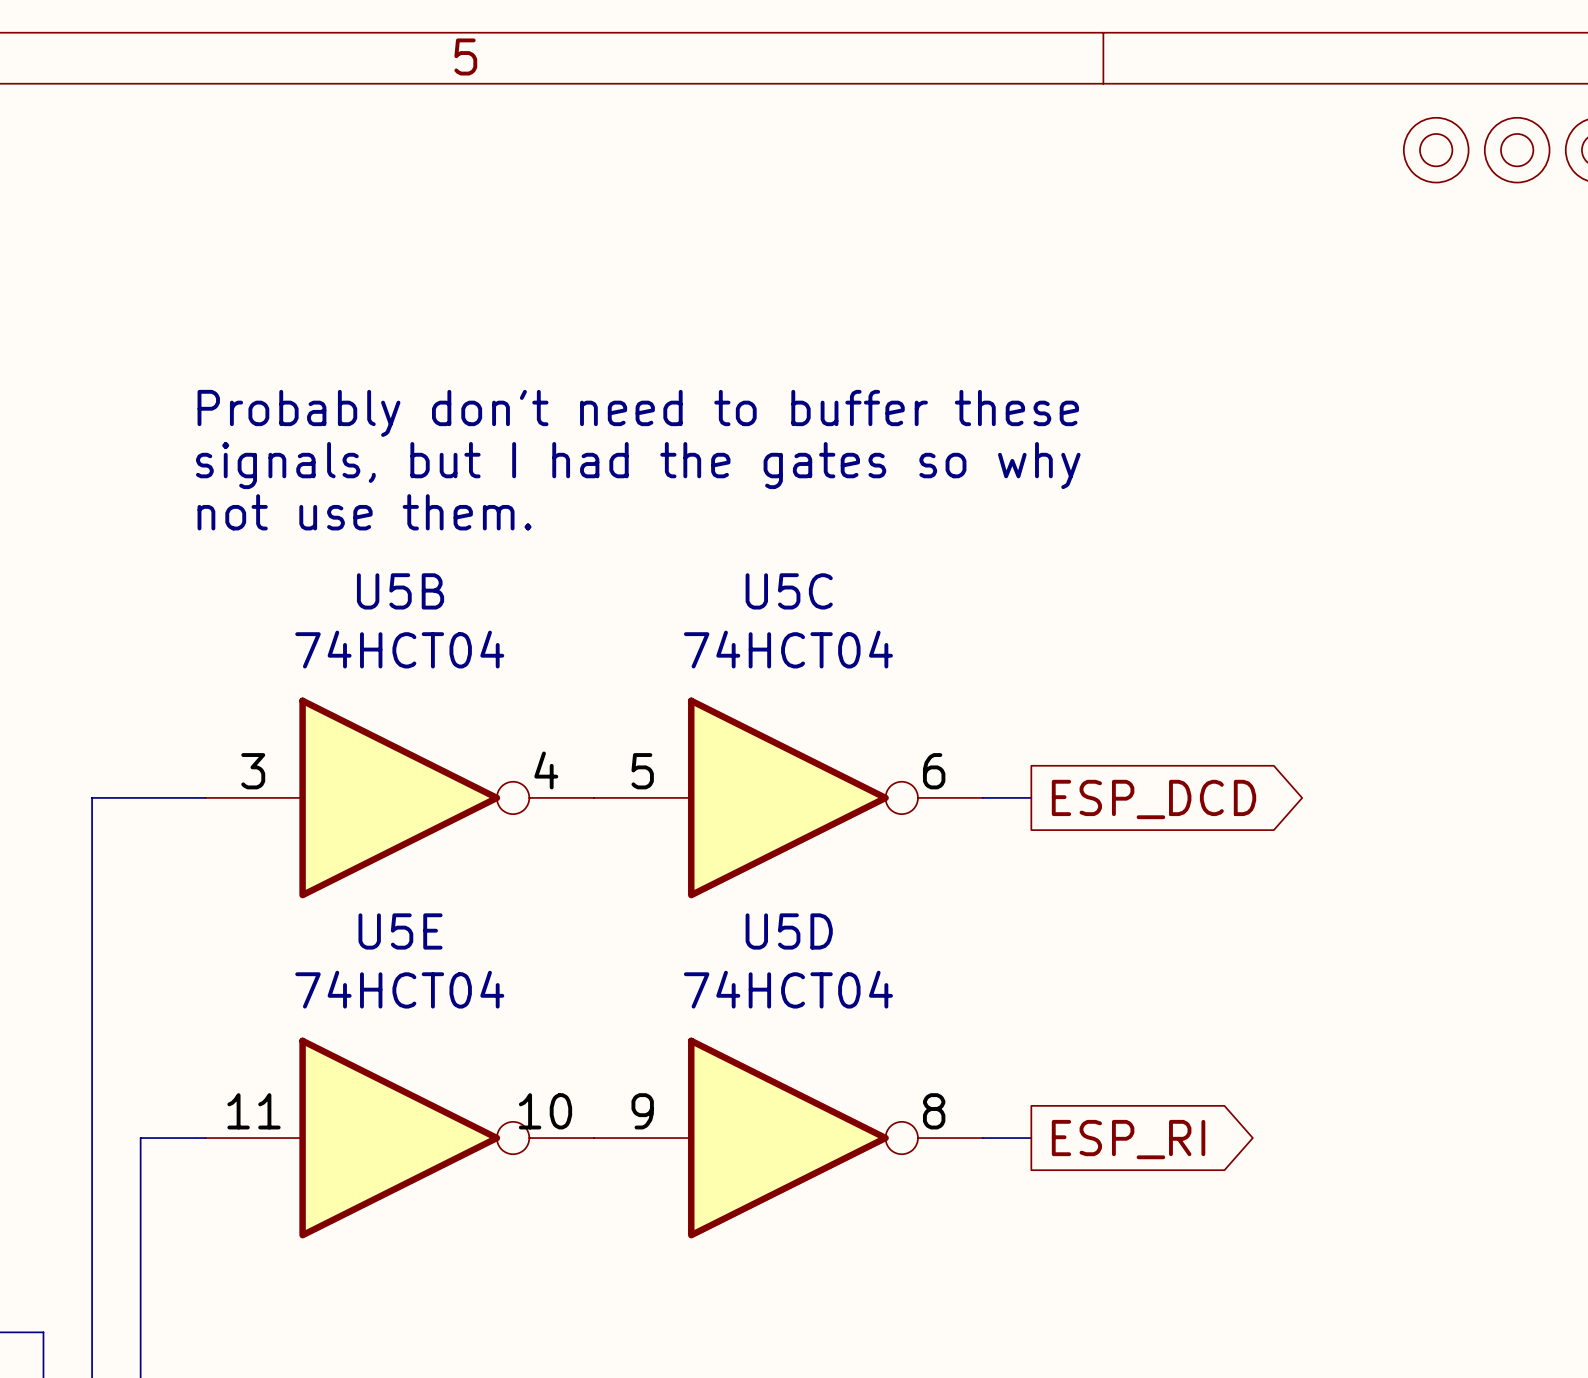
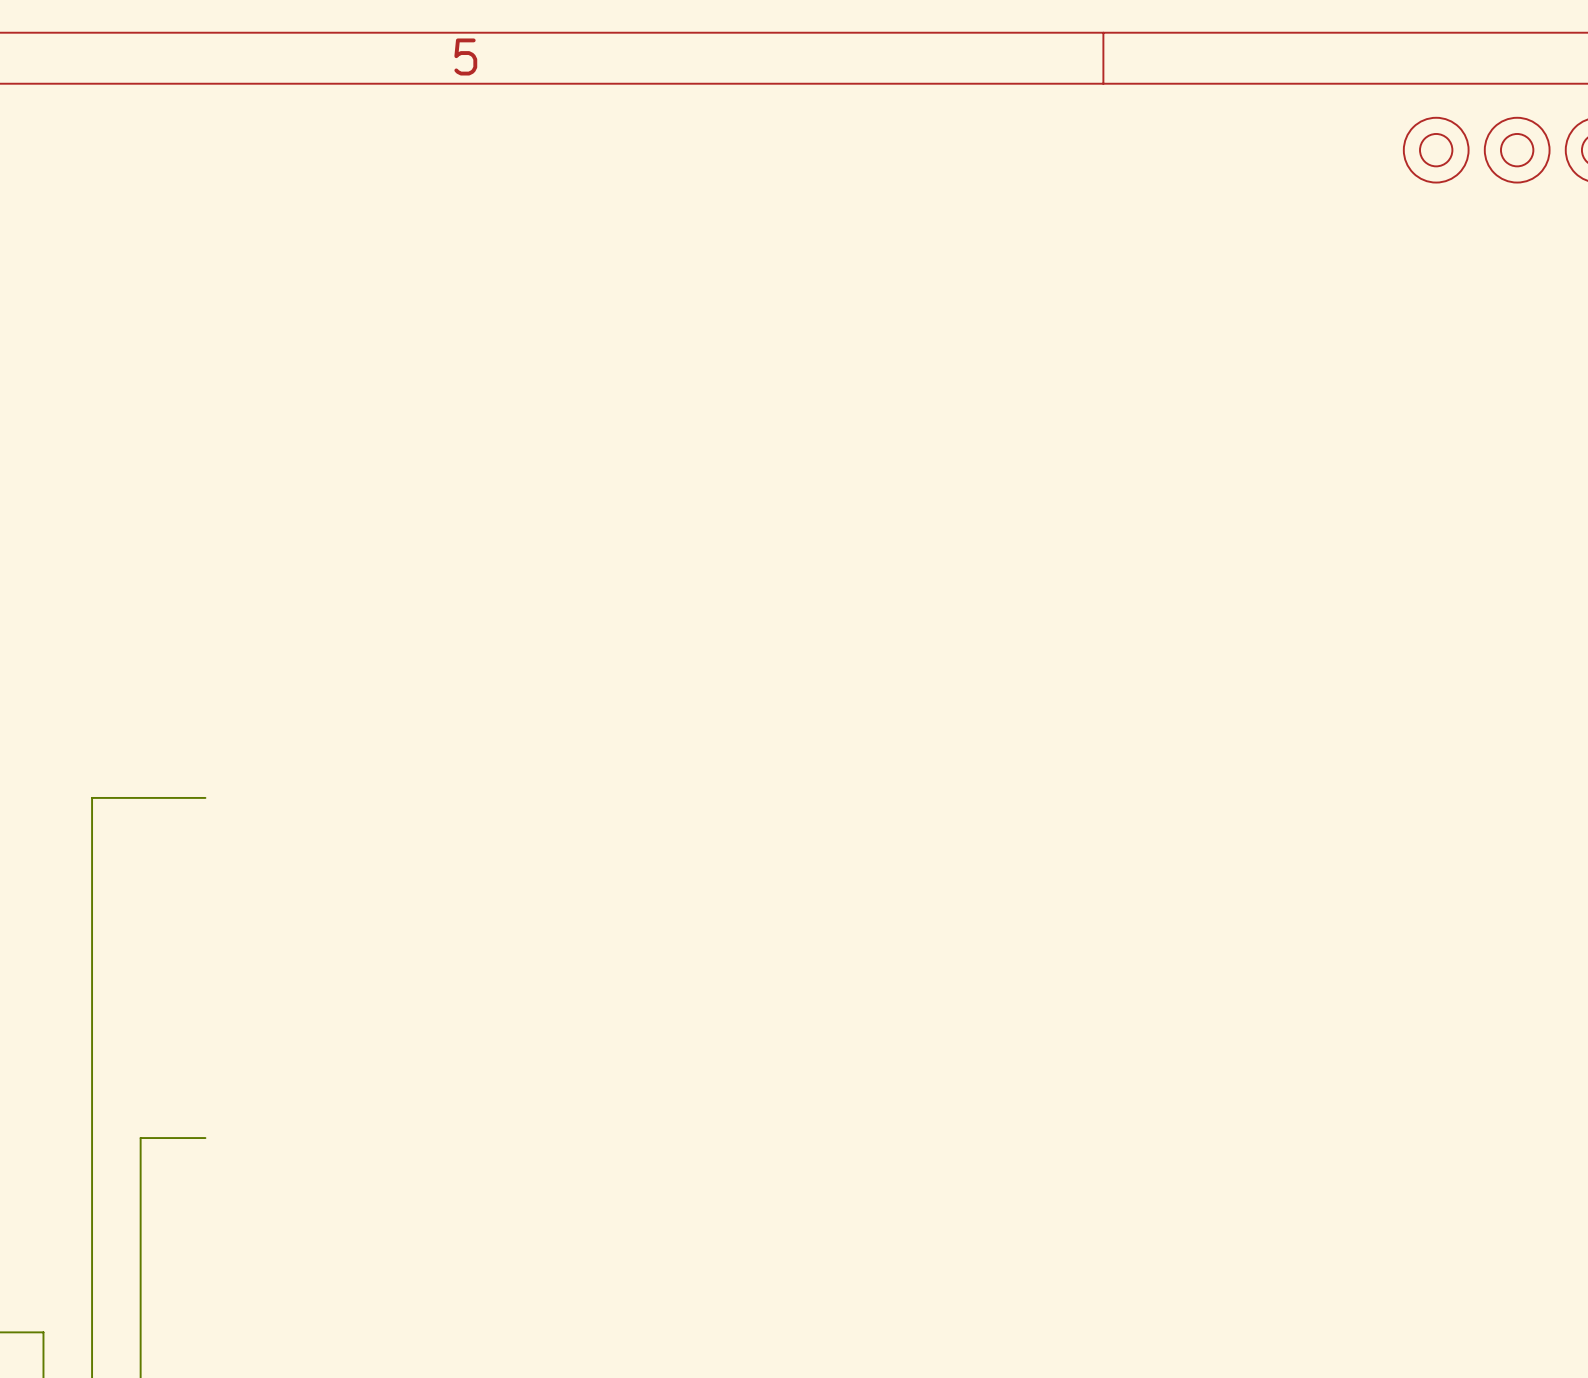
text: Probably don't need to buffer these (638, 413) -> none
text: signals, but I had the gates so why (638, 465) -> none
text: not use them. (364, 512) -> none
U5B: 74HCT04 (399, 797) -> none
U5C: 74HCT04 (788, 797) -> none
wire: (982, 797) (1031, 797) -> none
global label: ESP_DCD (1154, 799) -> none
U5E: 74HCT04 (399, 1138) -> none
U5D: 74HCT04 (788, 1138) -> none
wire: (982, 1138) (1031, 1138) -> none
global label: ESP_RI (1128, 1139) -> none

